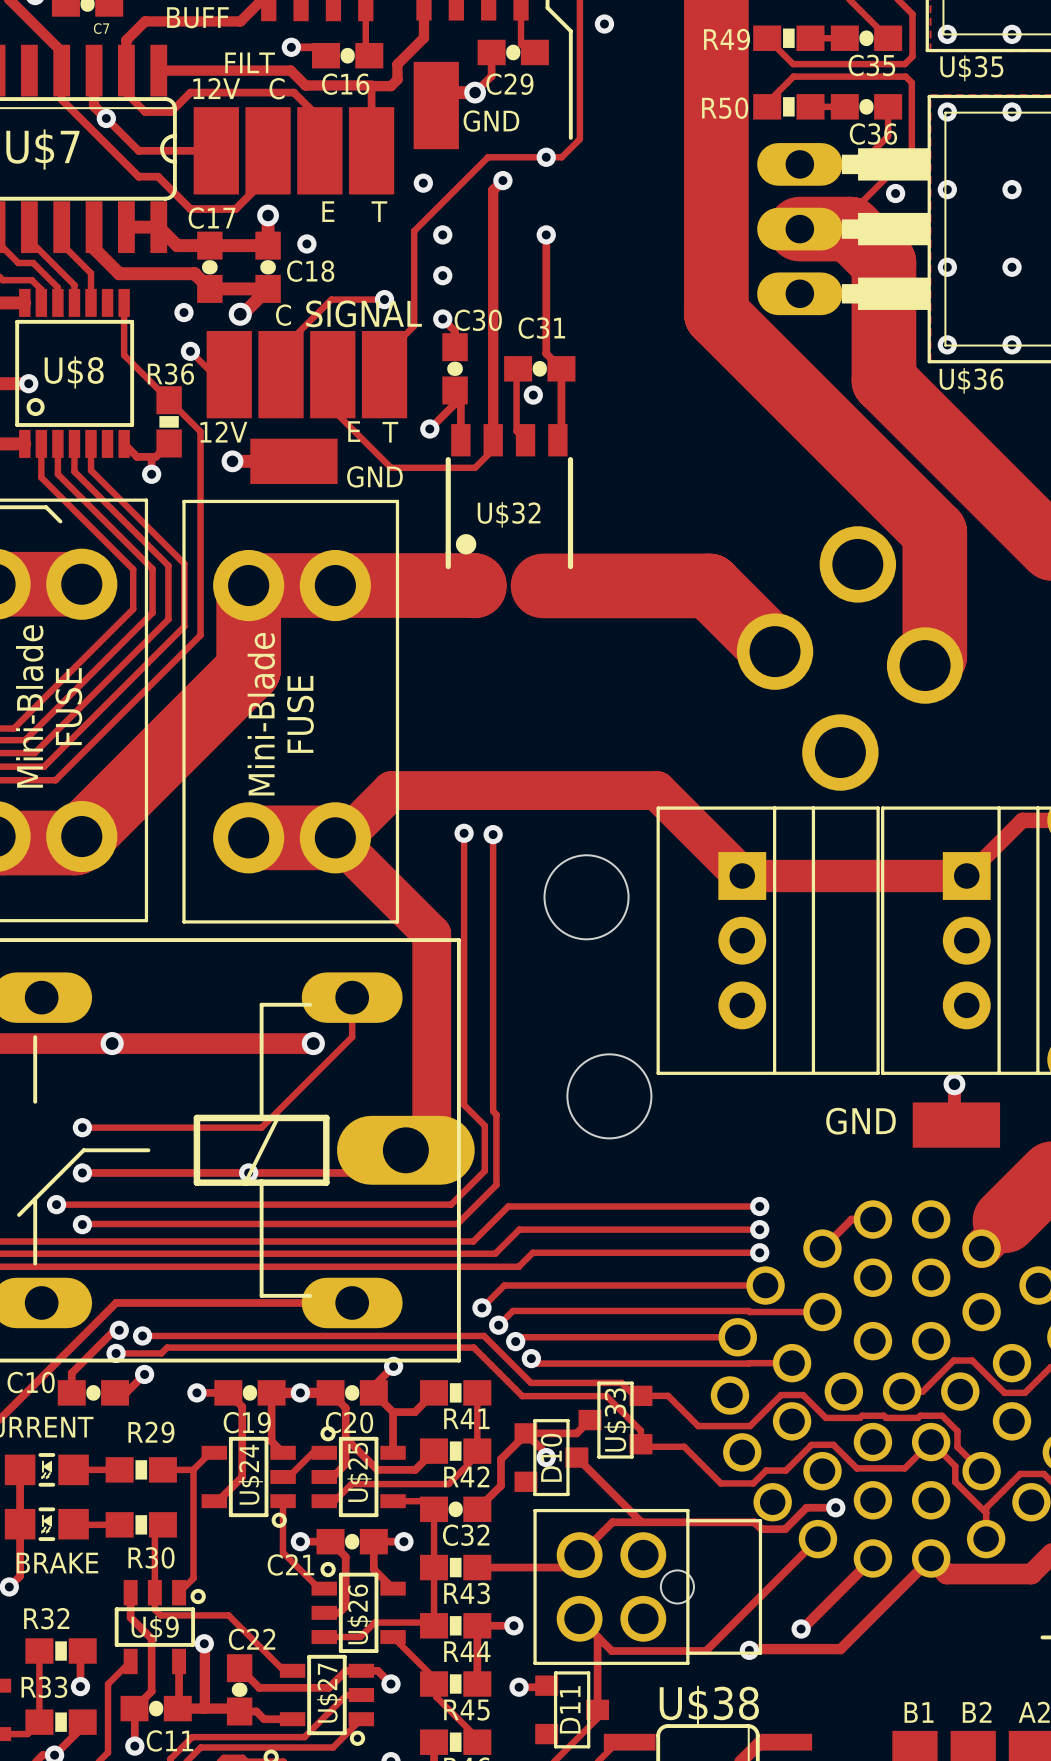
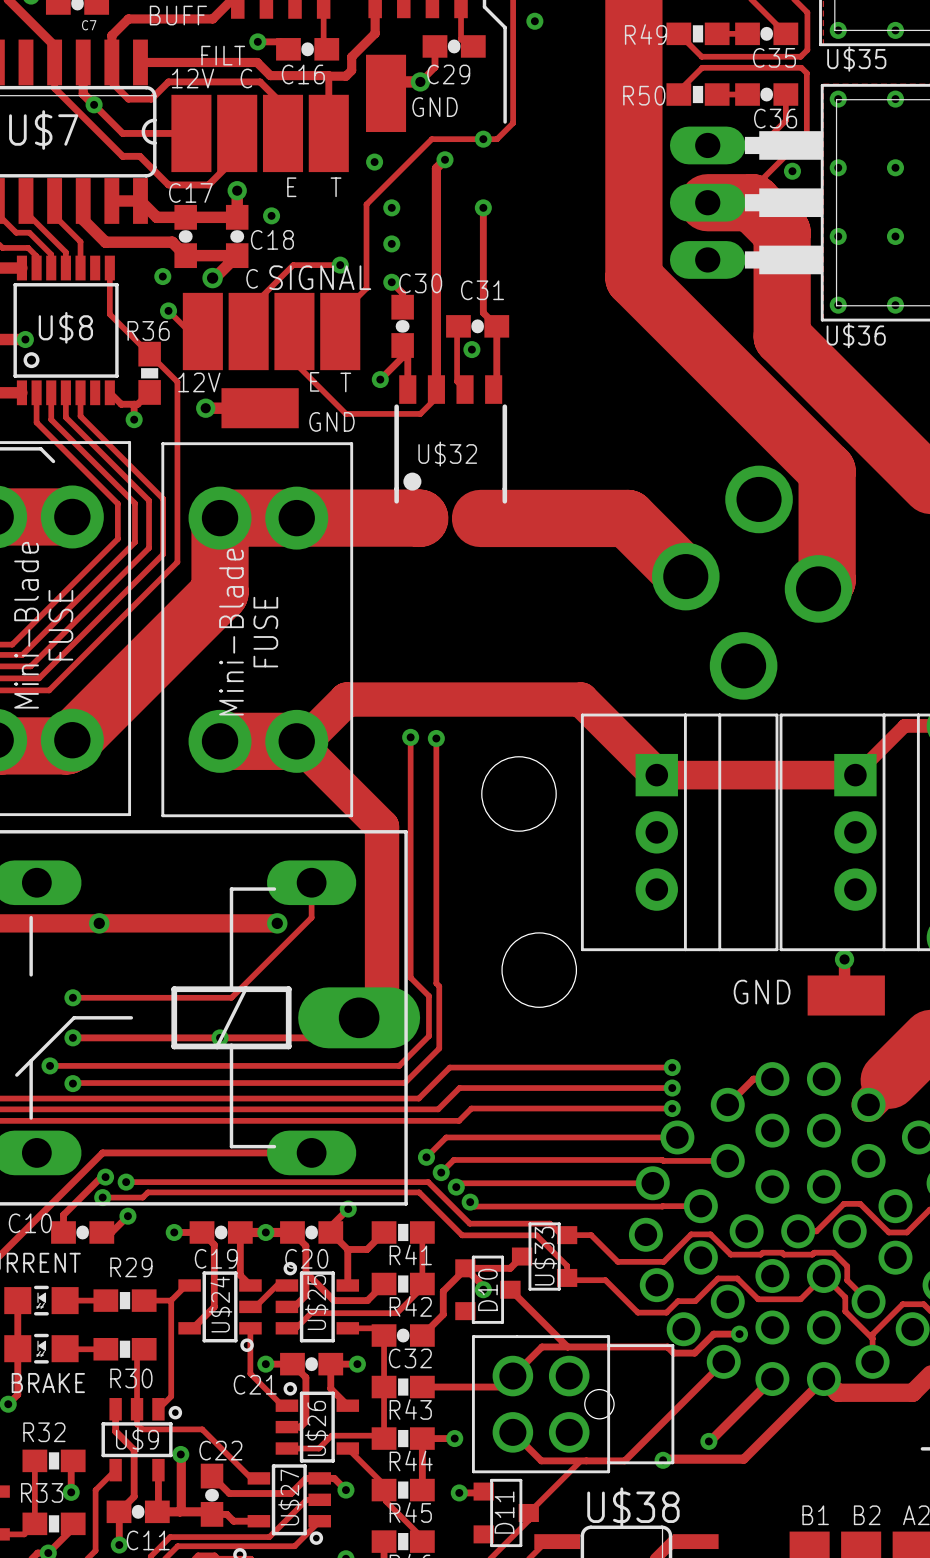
track: (597, 1636) (597, 1709) -> (586, 1460) (580, 1460) (528, 1512)

